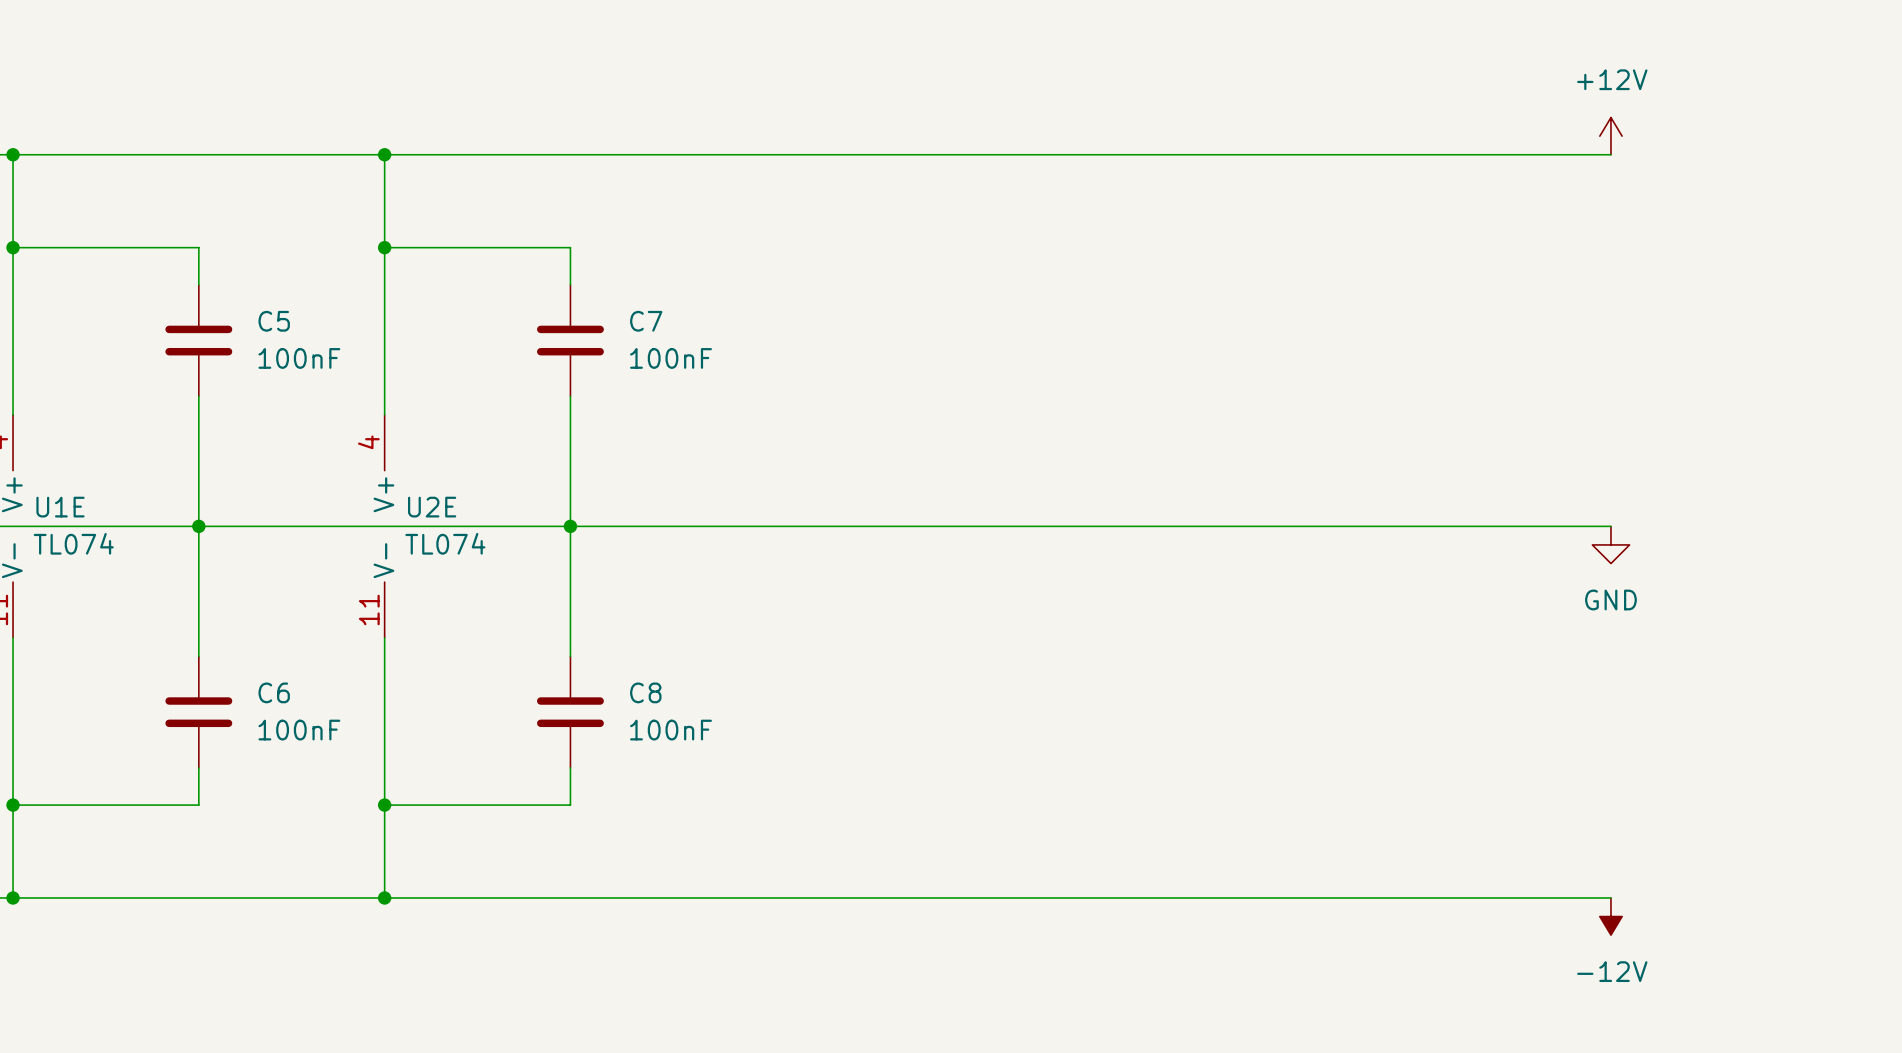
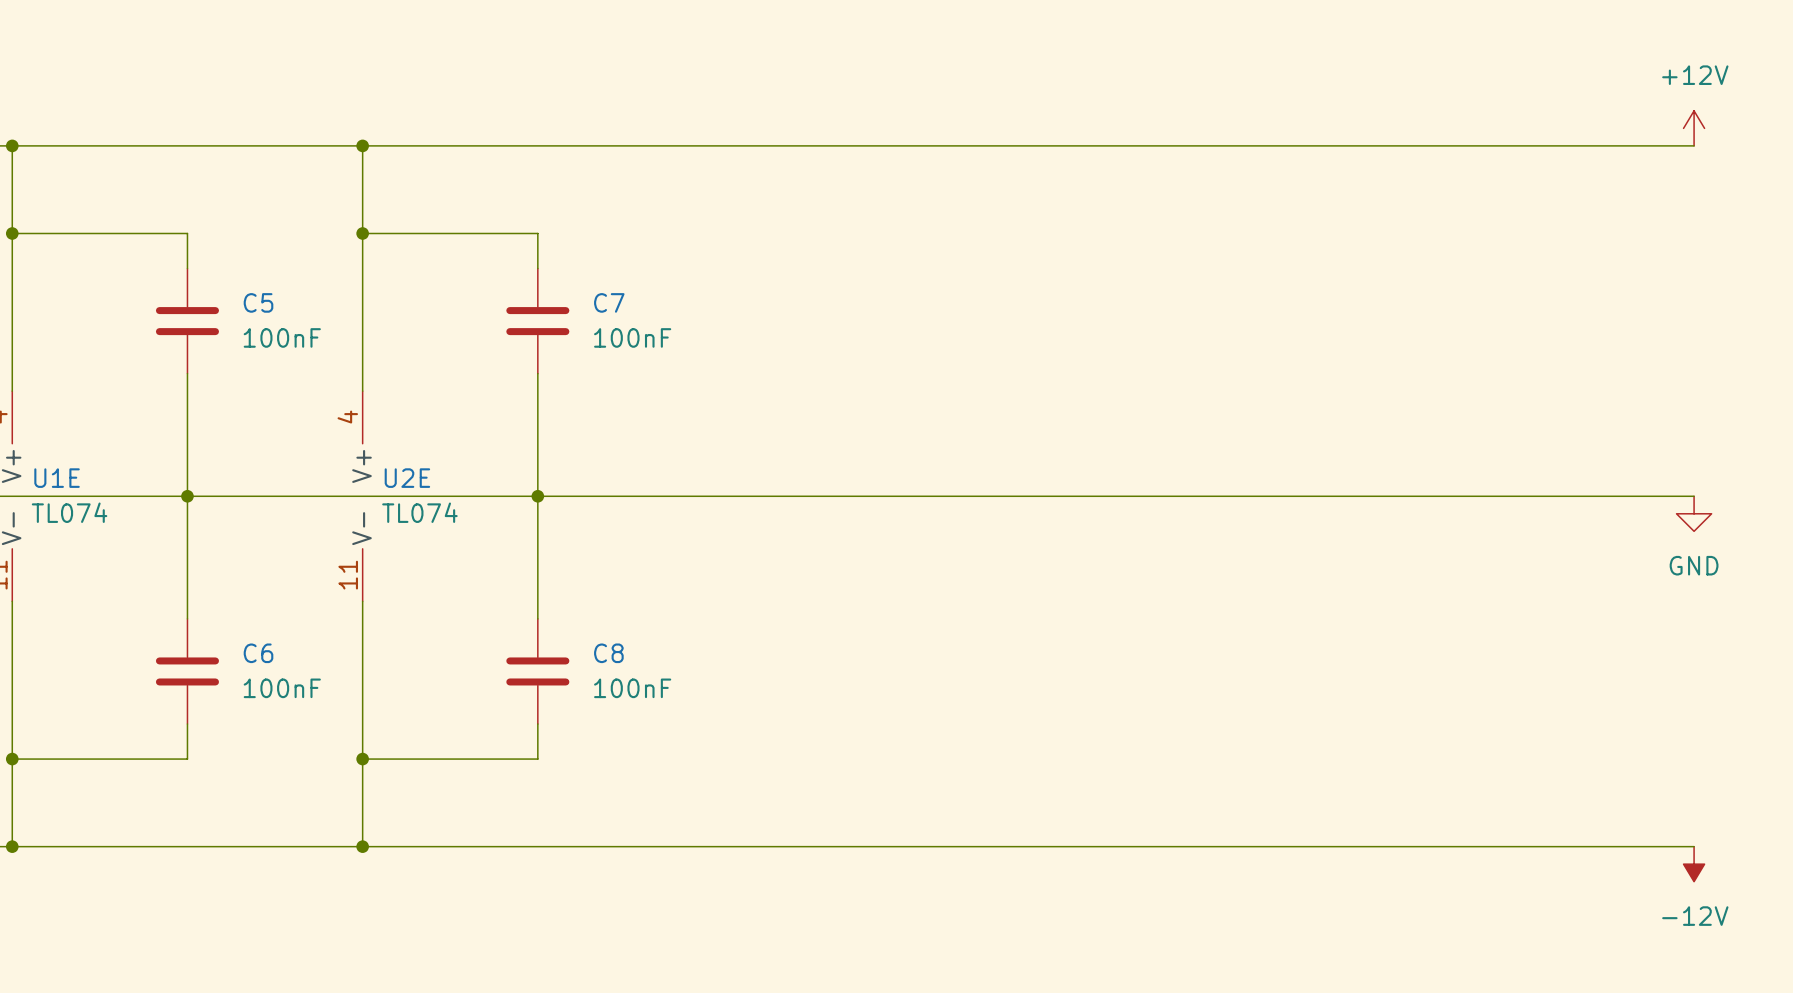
power symbol position: +12V (1610, 136) -> +12V (1694, 128)
wire: none -> (1518, 145) (1694, 145)
wire: none -> (1518, 496) (1694, 496)
power symbol position: GND (1610, 544) -> GND (1694, 513)
wire: none -> (1518, 846) (1694, 846)
power symbol position: -12V (1610, 916) -> -12V (1694, 864)

